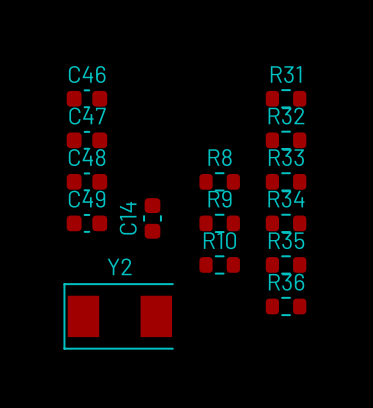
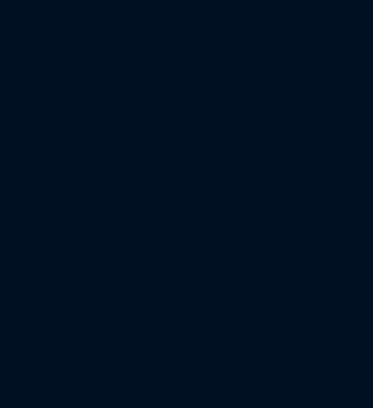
C46: (86, 98) -> none
R31: (286, 98) -> none
C47: (86, 140) -> none
R32: (286, 140) -> none
C48: (86, 181) -> none
R8: (219, 181) -> none
R33: (286, 181) -> none
C14: (152, 218) -> none
C49: (86, 223) -> none
R9: (219, 223) -> none
R34: (286, 223) -> none
R10: (219, 264) -> none
R35: (286, 264) -> none
R36: (286, 306) -> none
Y2: (118, 316) -> none

